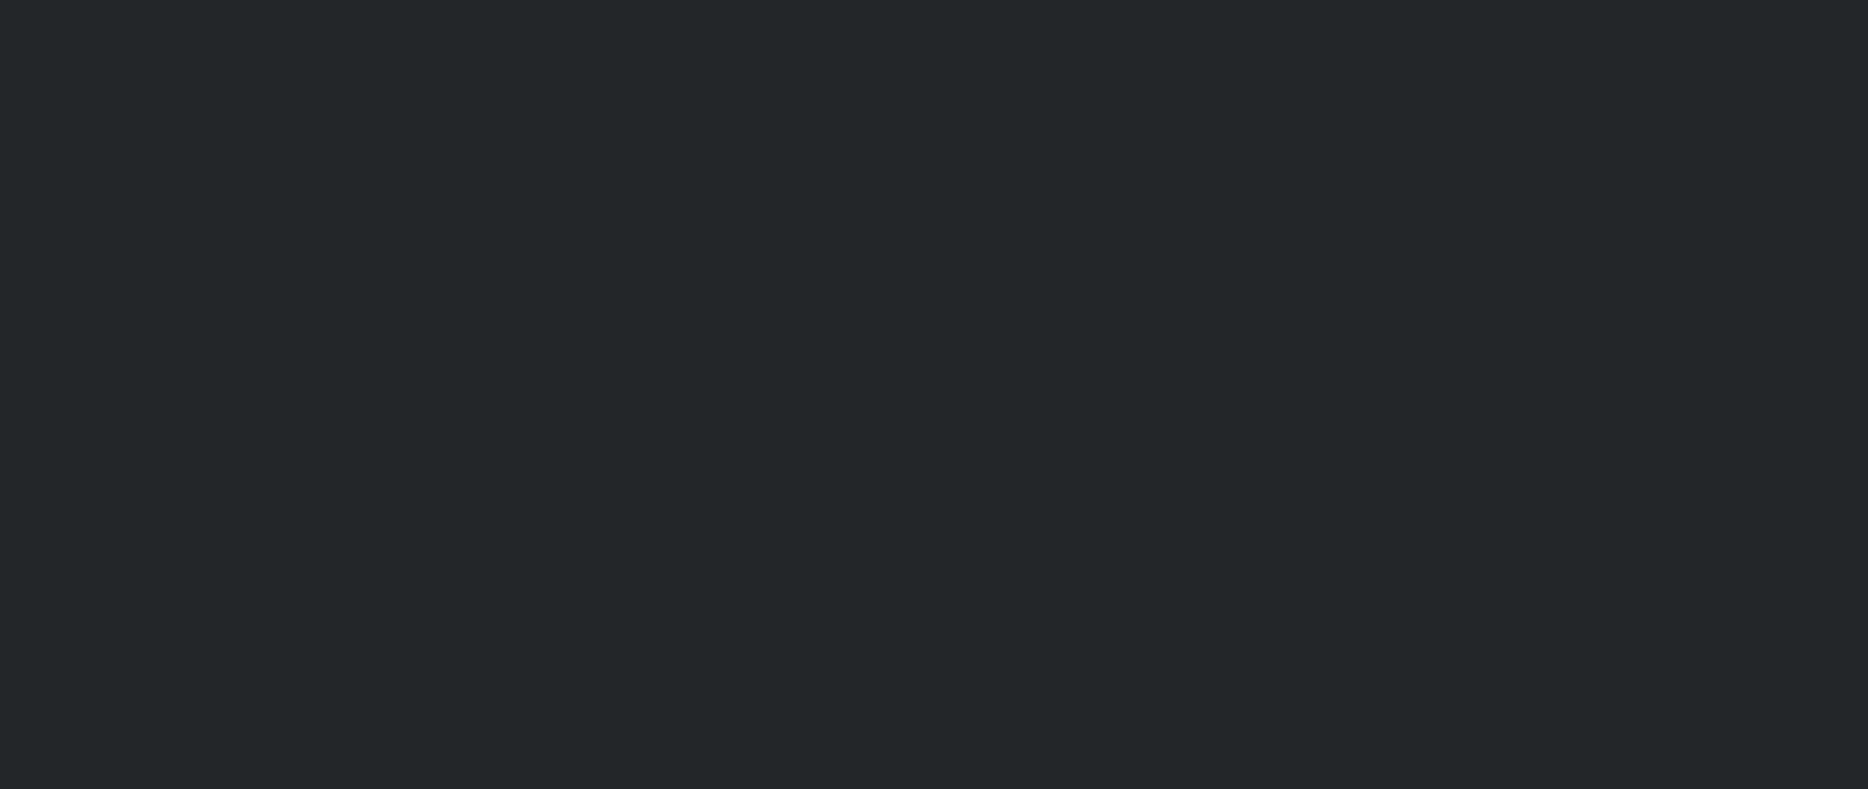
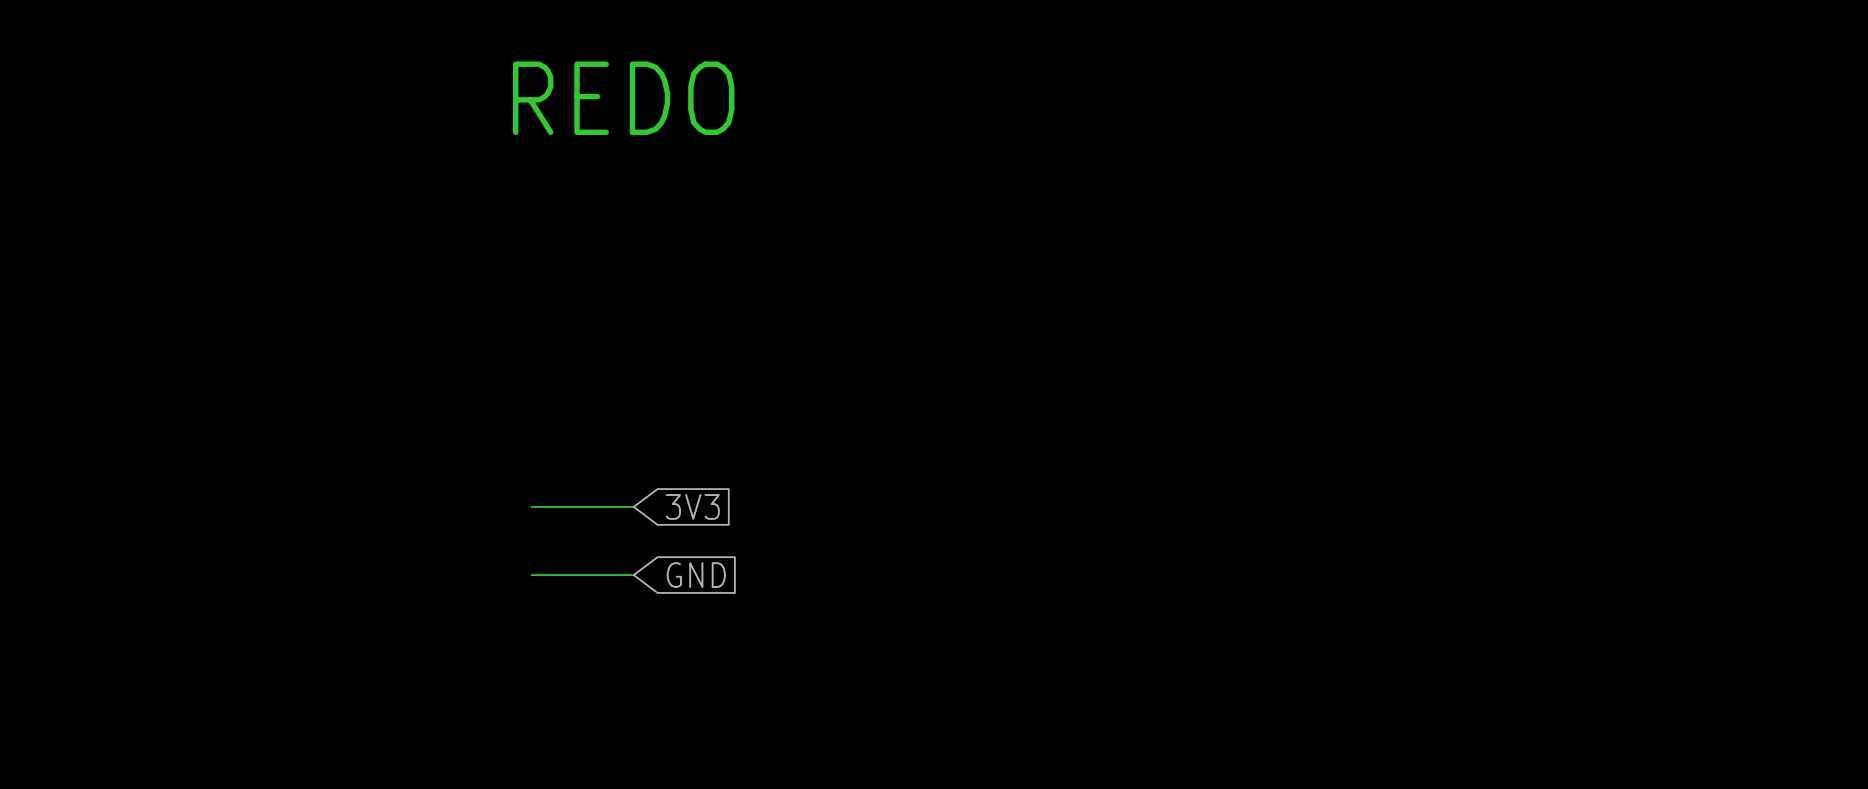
text: none -> REDO (623, 98)
wire: none -> (531, 506) (633, 506)
global label: none -> 3V3 (692, 506)
wire: none -> (531, 575) (633, 575)
global label: none -> GND (696, 575)

